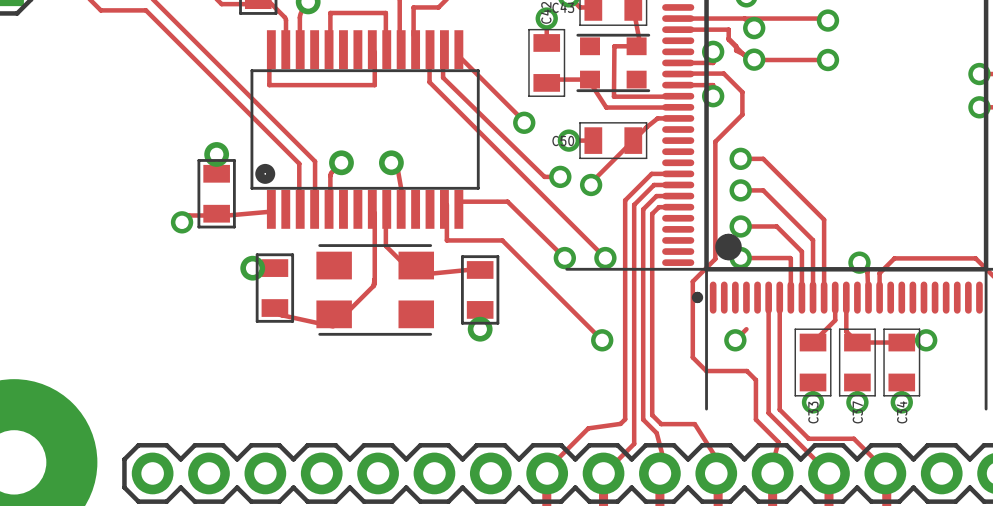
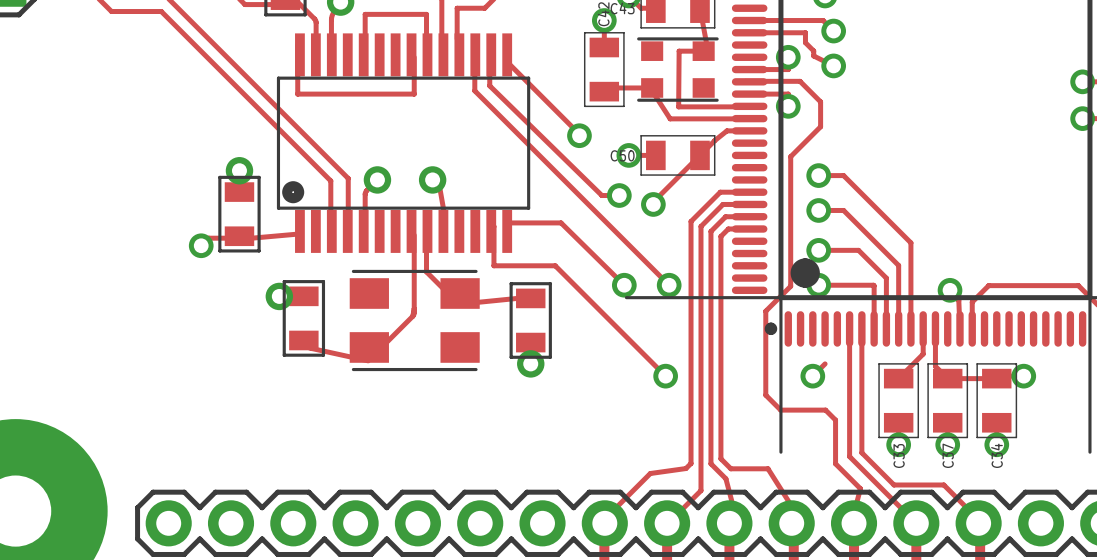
track: (744, 18) (825, 18) (827, 20) -> none
via: (827, 20) -> none
track: (728, 38) (749, 60) (827, 60) -> none
via: (827, 60) -> none

